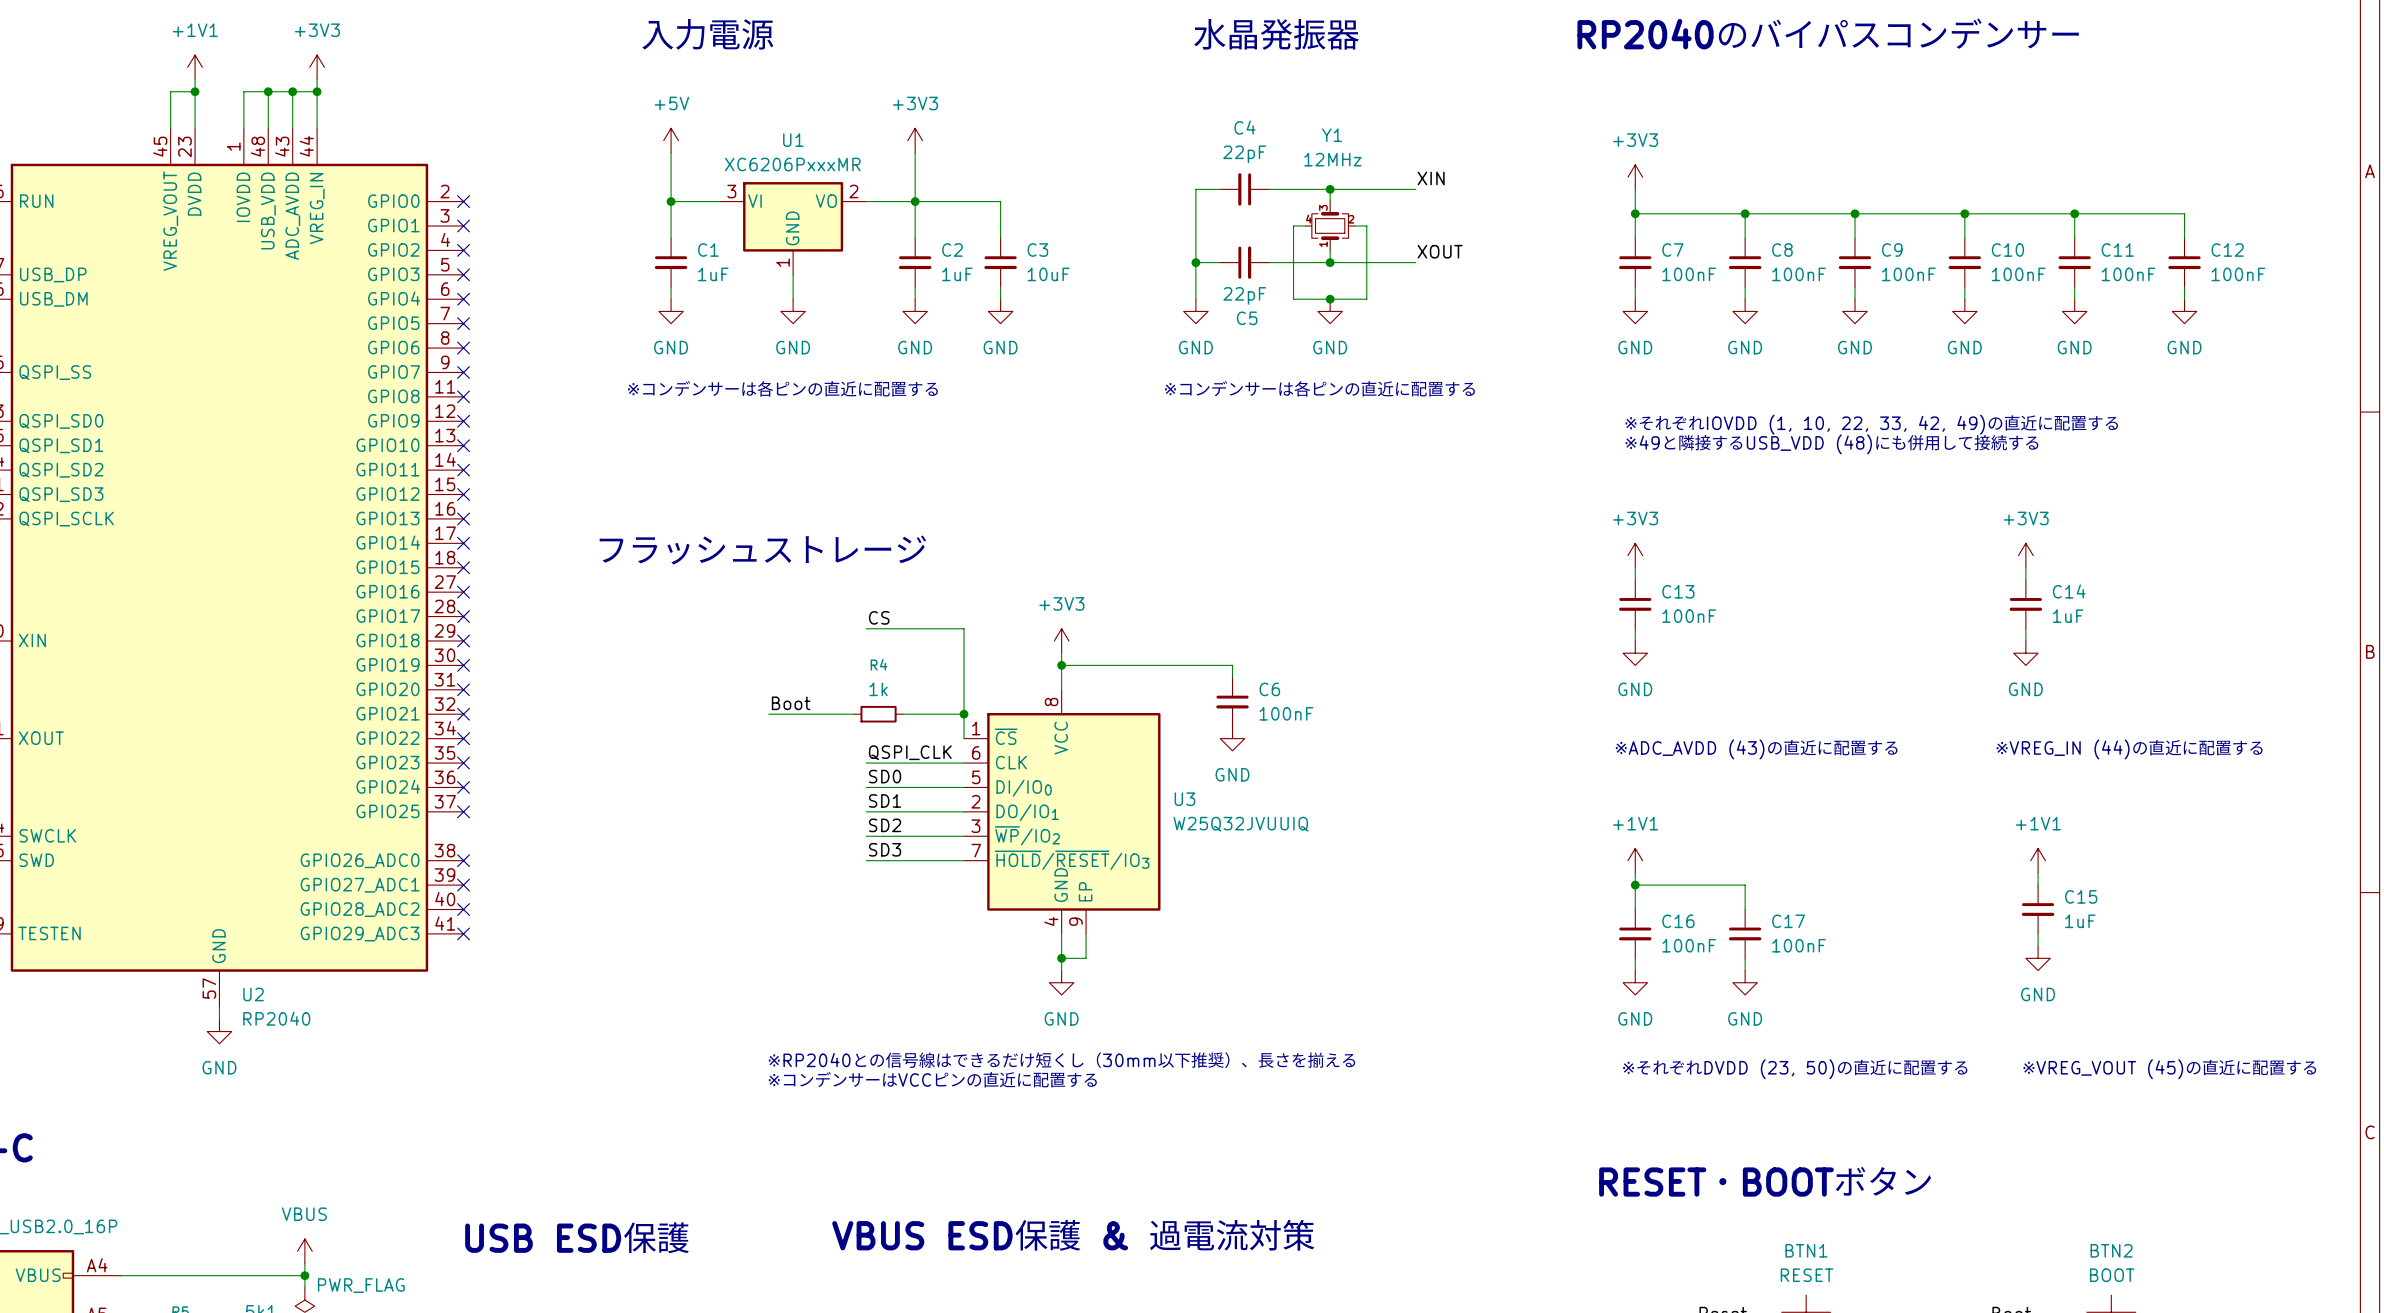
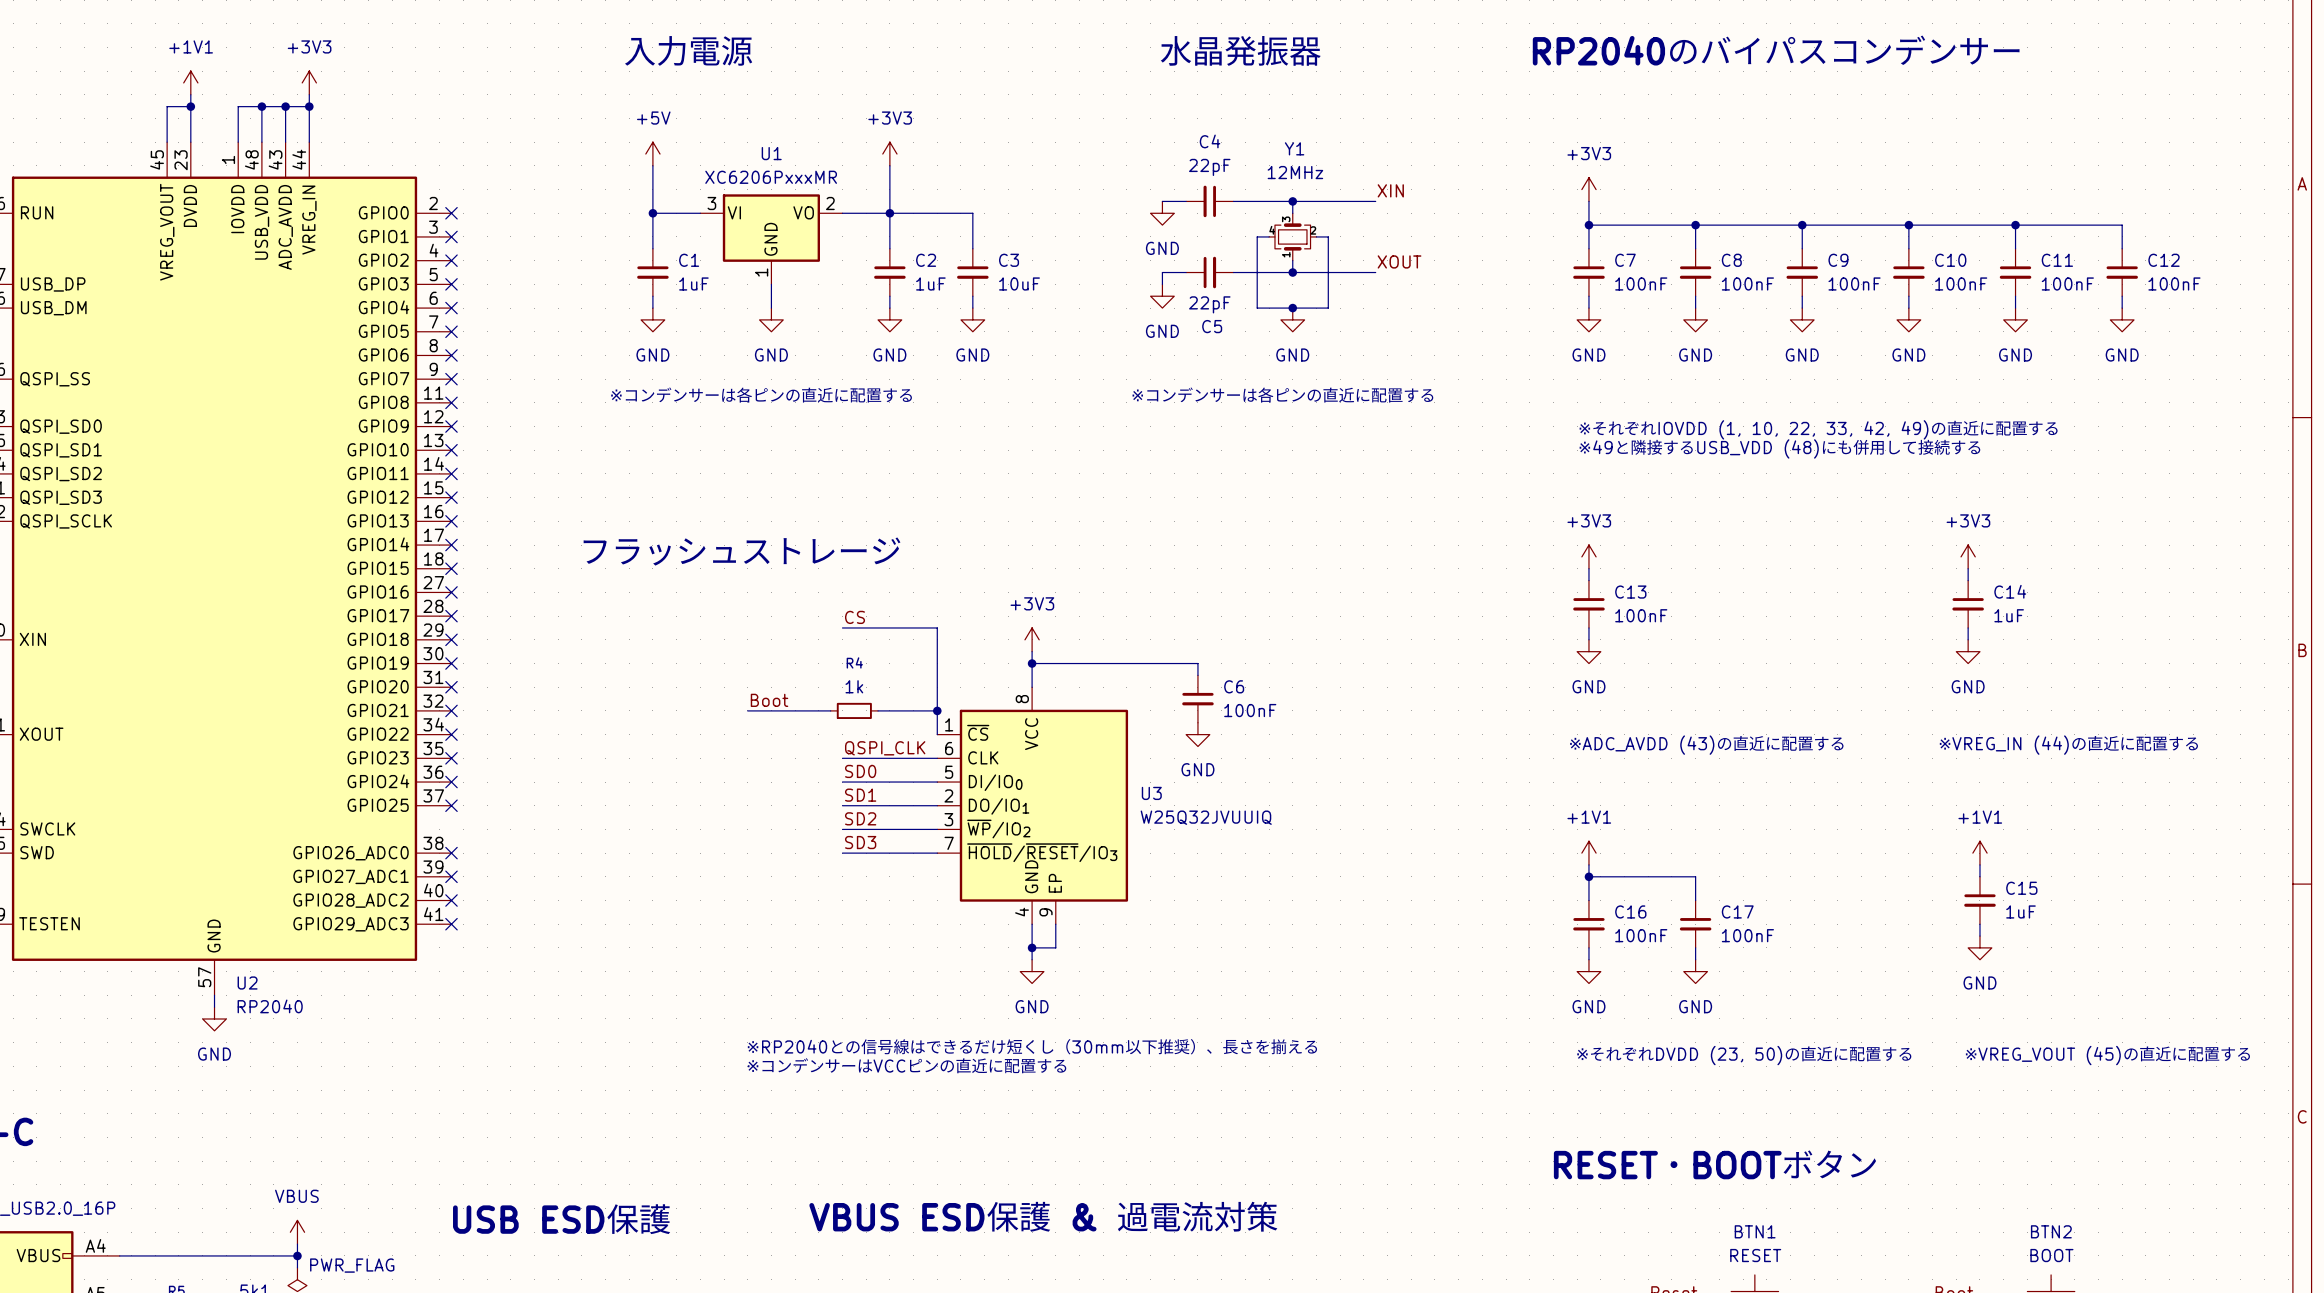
wire: (1195, 189) (1195, 262) -> none
power symbol: none -> GND (1162, 213)
junction: (1195, 262) -> none
power symbol position: GND (1195, 311) -> GND (1162, 296)

